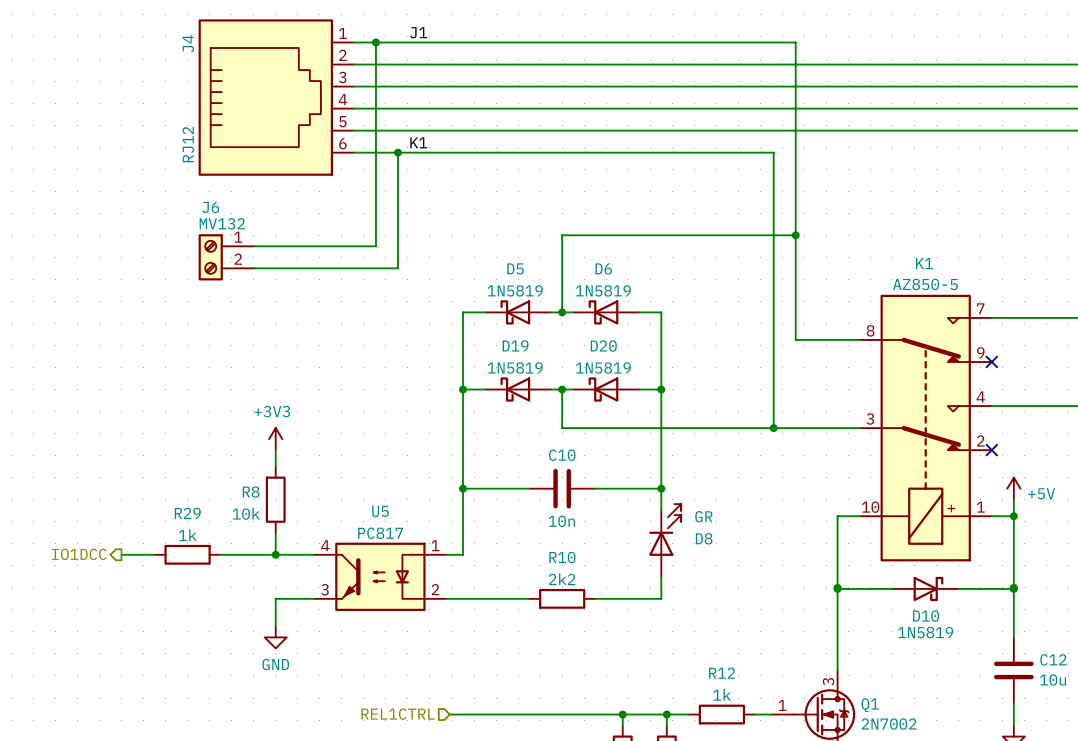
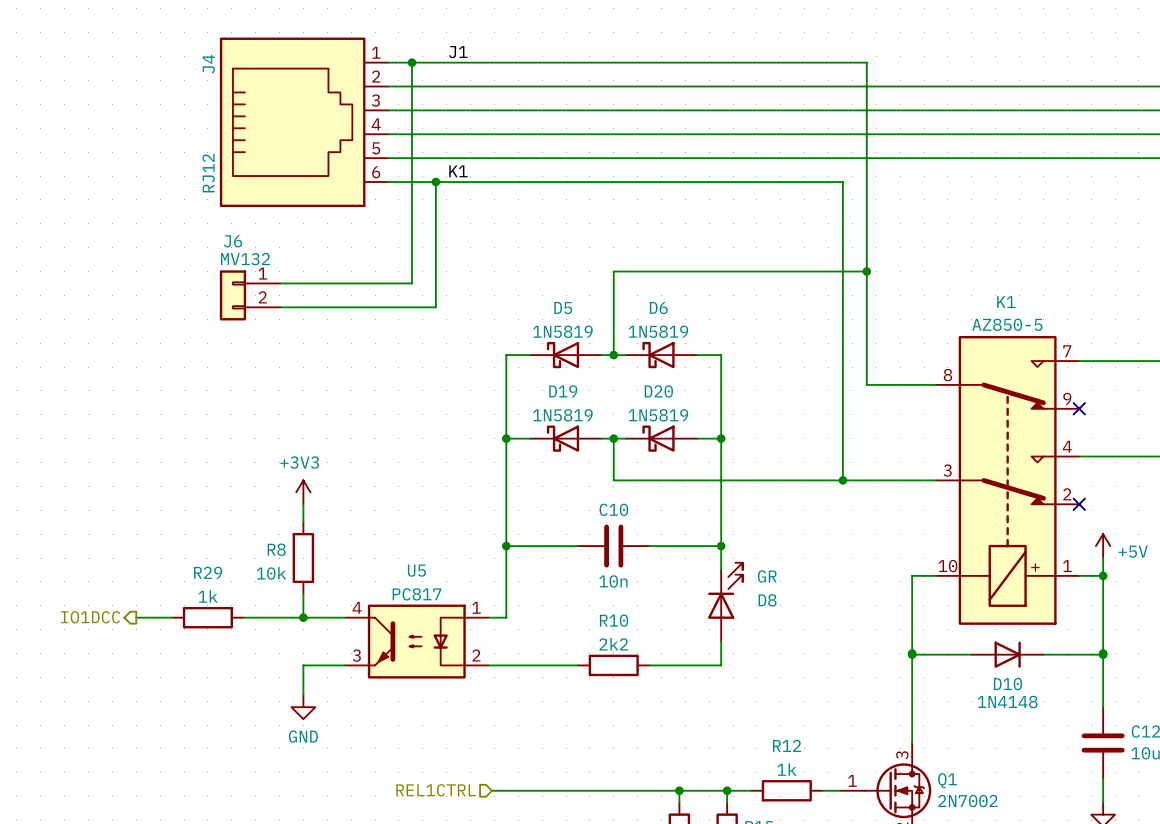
J6 symbol: [198, 234, 255, 281] -> [219, 270, 281, 321]
D10 symbol: [892, 576, 959, 602] -> [971, 641, 1044, 668]
D10 value: 1N5819 (925, 632) -> 1N4148 (1007, 701)

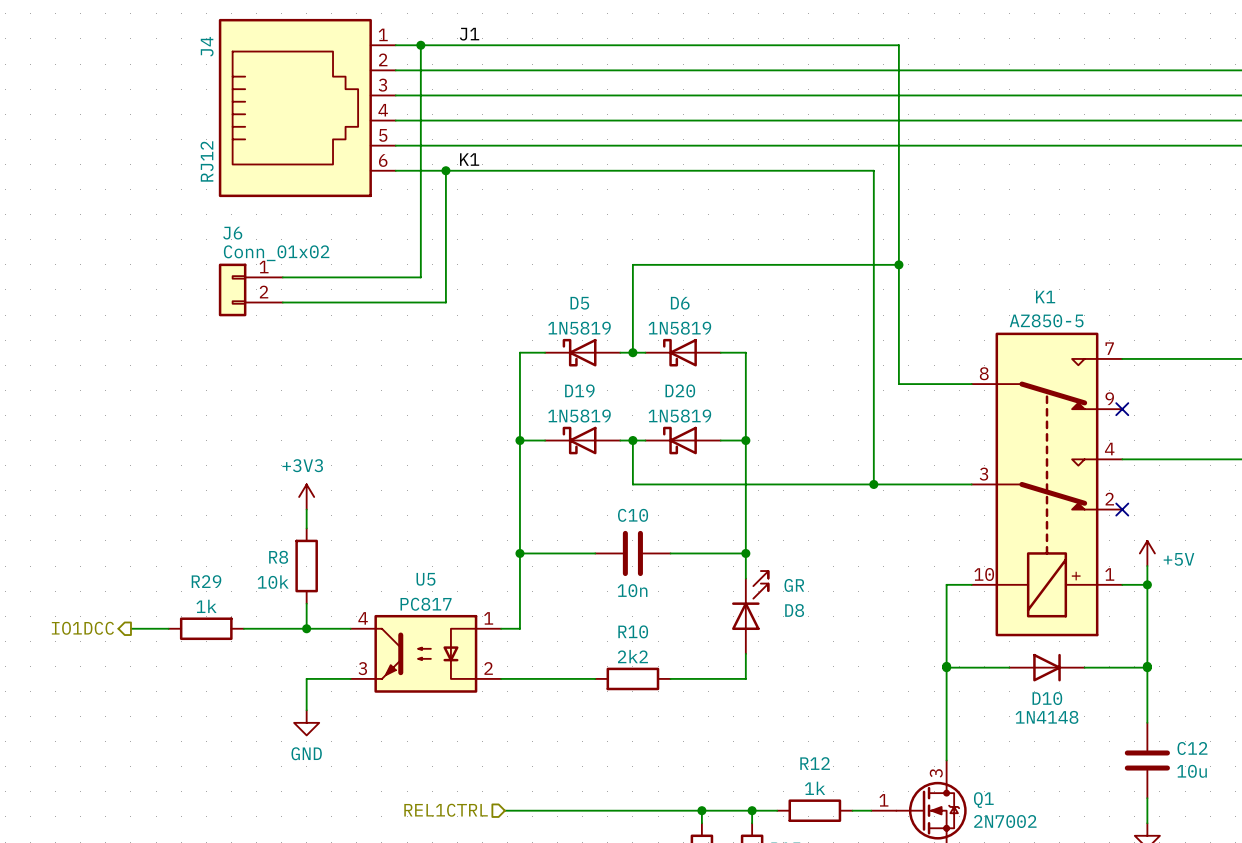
J6 value: MV132 (245, 259) -> Conn_01x02 (276, 253)

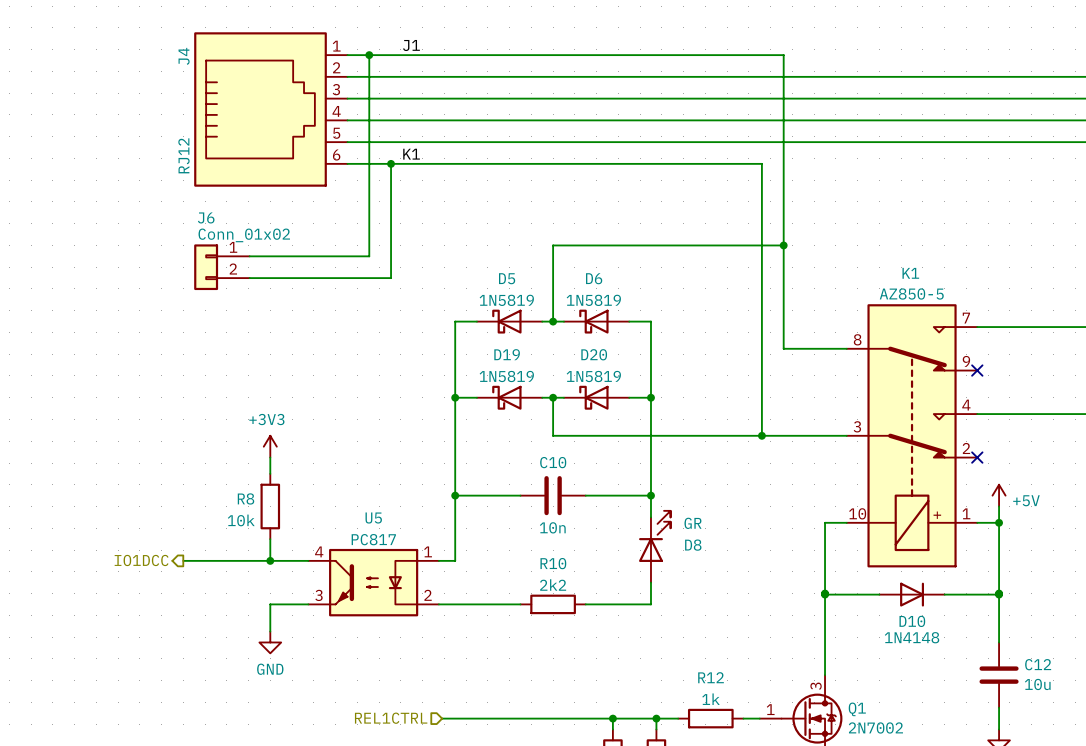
hierarchical label position: IO1DCC (82, 628) -> IO1DCC (141, 560)
wire: (130, 628) (168, 628) -> (183, 560) (215, 560)
R29: 1k (206, 628) -> none

